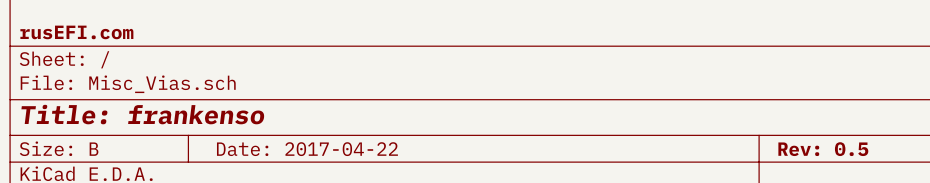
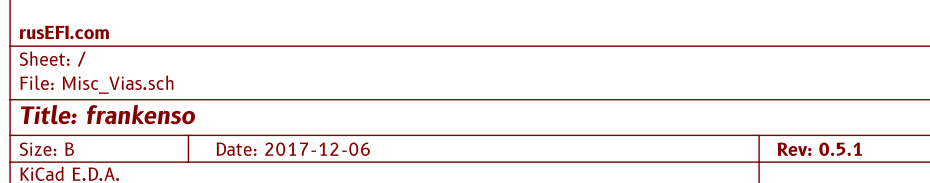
title block: Date: 2017-04-22 (307, 149) -> Date: 2017-12-06 (293, 149)
title block: Rev: 0.5 (823, 149) -> Rev: 0.5.1 (819, 149)

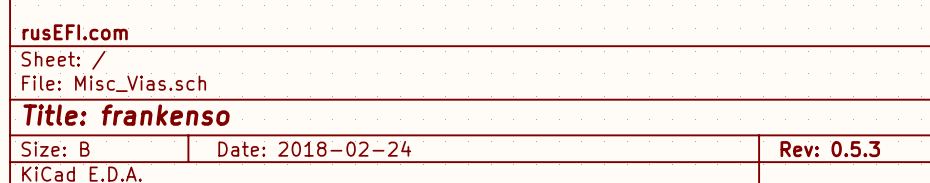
title block: Date: 2017-12-06 (293, 149) -> Date: 2018-02-24 (314, 148)
title block: Rev: 0.5.1 (819, 149) -> Rev: 0.5.3 (830, 149)

